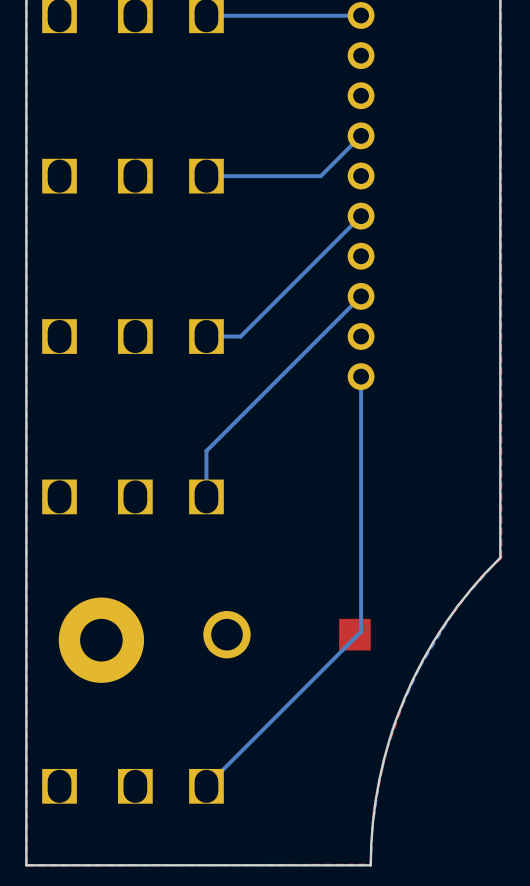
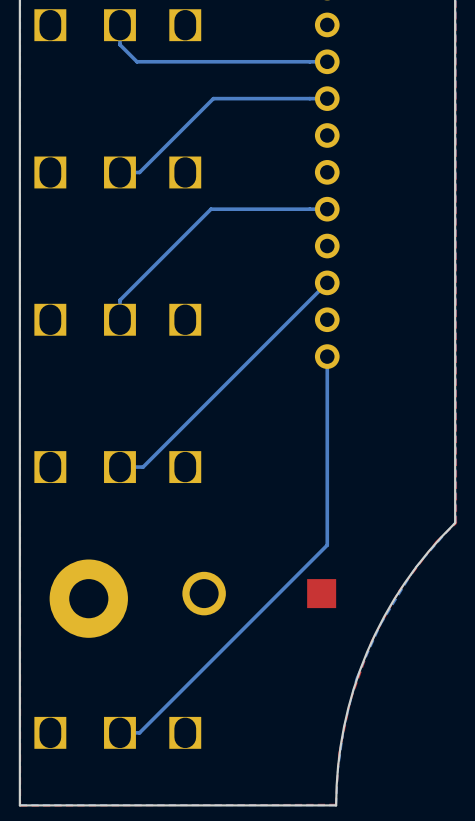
bottom track: none -> (119, 25) (119, 44) (136, 61) (327, 61)
bottom track: (361, 15) (206, 15) -> none
bottom track: none -> (327, 98) (213, 98) (139, 172) (119, 172)
bottom track: (361, 135) (320, 176) (206, 176) -> none
bottom track: (361, 216) (240, 336) (206, 336) -> (327, 209) (210, 209) (119, 300) (119, 319)
bottom track: (206, 450) (206, 496) -> (185, 424) (143, 467) (119, 467)
bottom track: (361, 581) (361, 631) (206, 786) -> (327, 545) (139, 732) (119, 732)

